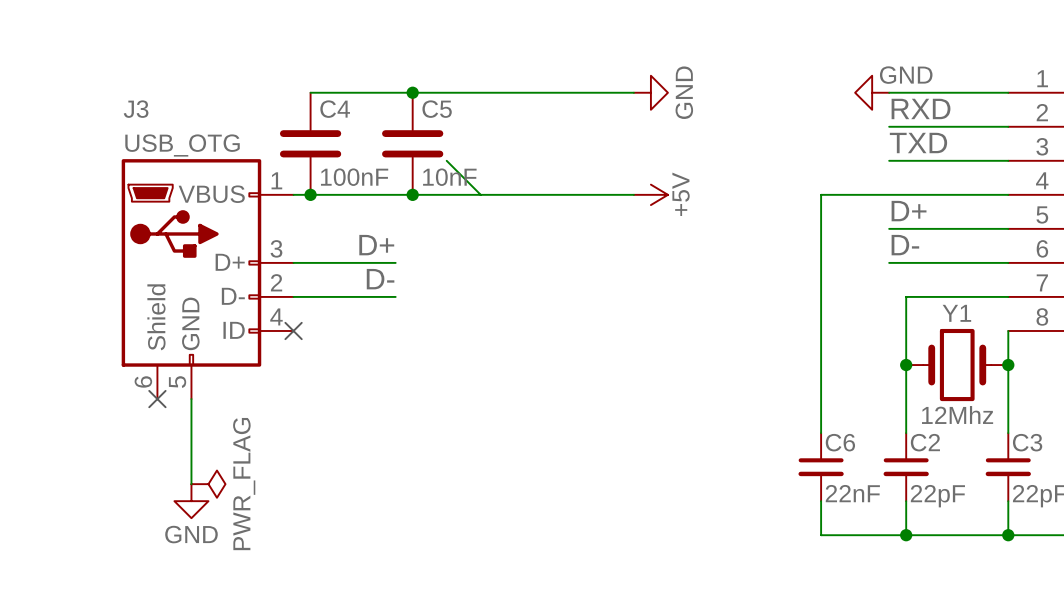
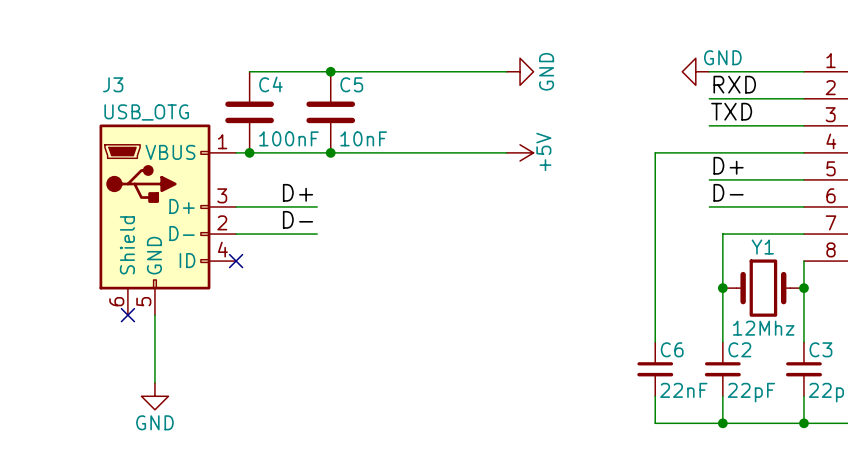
wire: (446, 160) (480, 194) -> none
power symbol: PWR_FLAG (208, 484) -> none

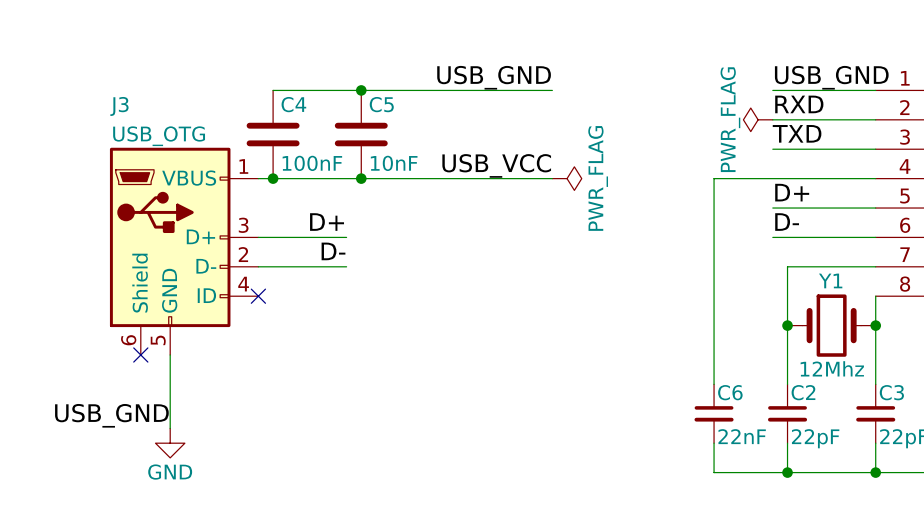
label: none -> USB_GND (494, 77)
label: none -> USB_GND (831, 77)
power symbol: GND (520, 71) -> none
power symbol: GND (695, 71) -> none
power symbol: none -> PWR_FLAG (758, 119)
label: none -> USB_VCC (496, 165)
power symbol: +5V (520, 152) -> PWR_FLAG (567, 178)
label: none -> USB_GND (111, 415)

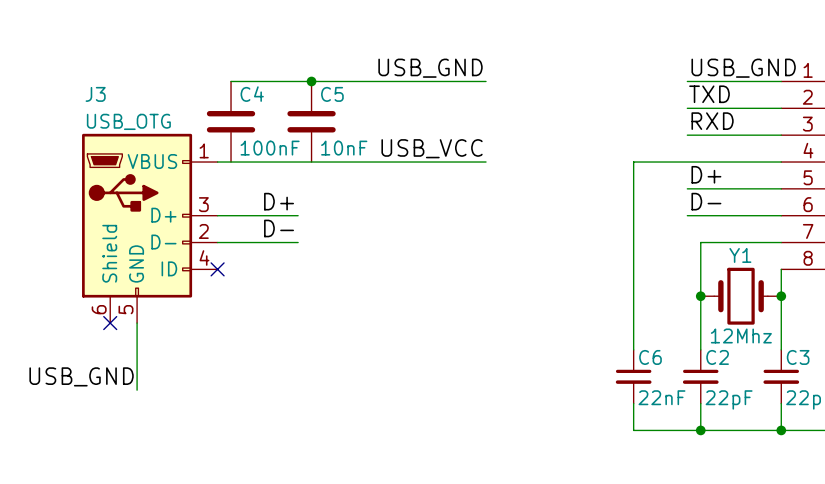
label: RXD (799, 104) -> TXD (709, 94)
power symbol: PWR_FLAG (758, 119) -> none
label: TXD (797, 133) -> RXD (712, 121)
junction: (273, 178) -> none
junction: (361, 178) -> none
power symbol: PWR_FLAG (567, 178) -> none
power symbol: GND (170, 443) -> none

